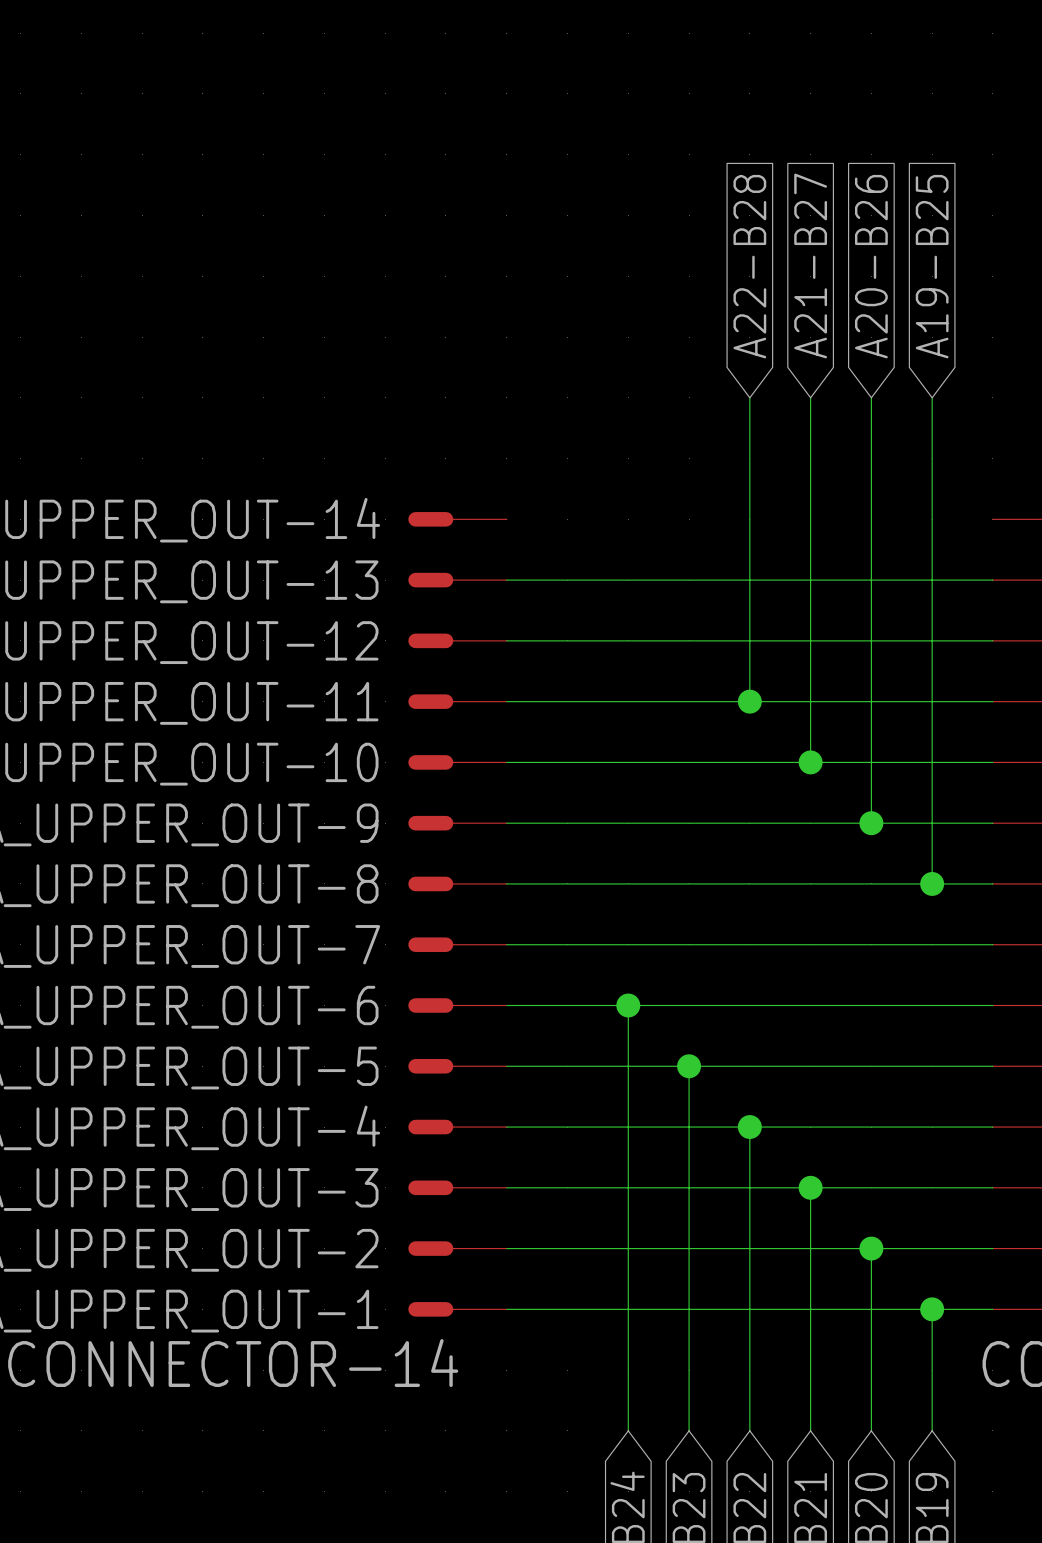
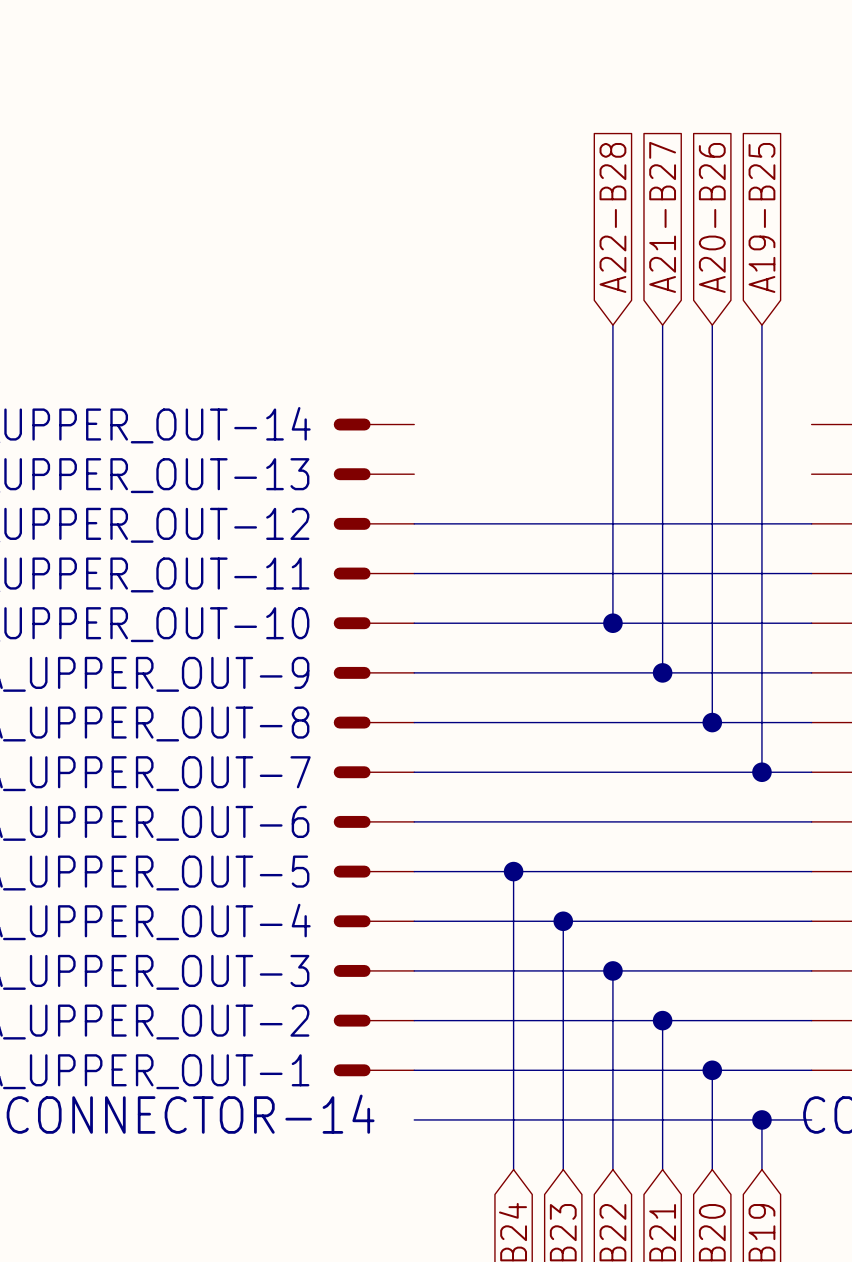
wire: (506, 580) (992, 580) -> none
junction: (749, 701) -> none
junction: none -> (612, 623)
junction: (810, 762) -> none
junction: none -> (662, 672)
junction: (871, 823) -> none
junction: none -> (712, 722)
junction: (932, 883) -> none
junction: none -> (761, 772)
wire: (628, 1005) (628, 1066) -> (612, 573) (612, 623)
junction: (628, 1005) -> none
junction: none -> (513, 871)
wire: (689, 1066) (689, 1127) -> (662, 623) (662, 672)
junction: (689, 1066) -> none
junction: none -> (563, 921)
wire: (749, 1127) (749, 1187) -> (712, 672) (712, 722)
junction: (749, 1127) -> none
junction: none -> (612, 970)
wire: (810, 1187) (810, 1248) -> (761, 722) (761, 772)
junction: (810, 1187) -> none
junction: none -> (662, 1020)
wire: (871, 1248) (871, 1309) -> none
junction: (871, 1248) -> none
junction: none -> (712, 1070)
wire: (932, 1309) (932, 1370) -> none
junction: (932, 1309) -> none
wire: none -> (414, 1119) (811, 1119)
junction: none -> (761, 1119)

